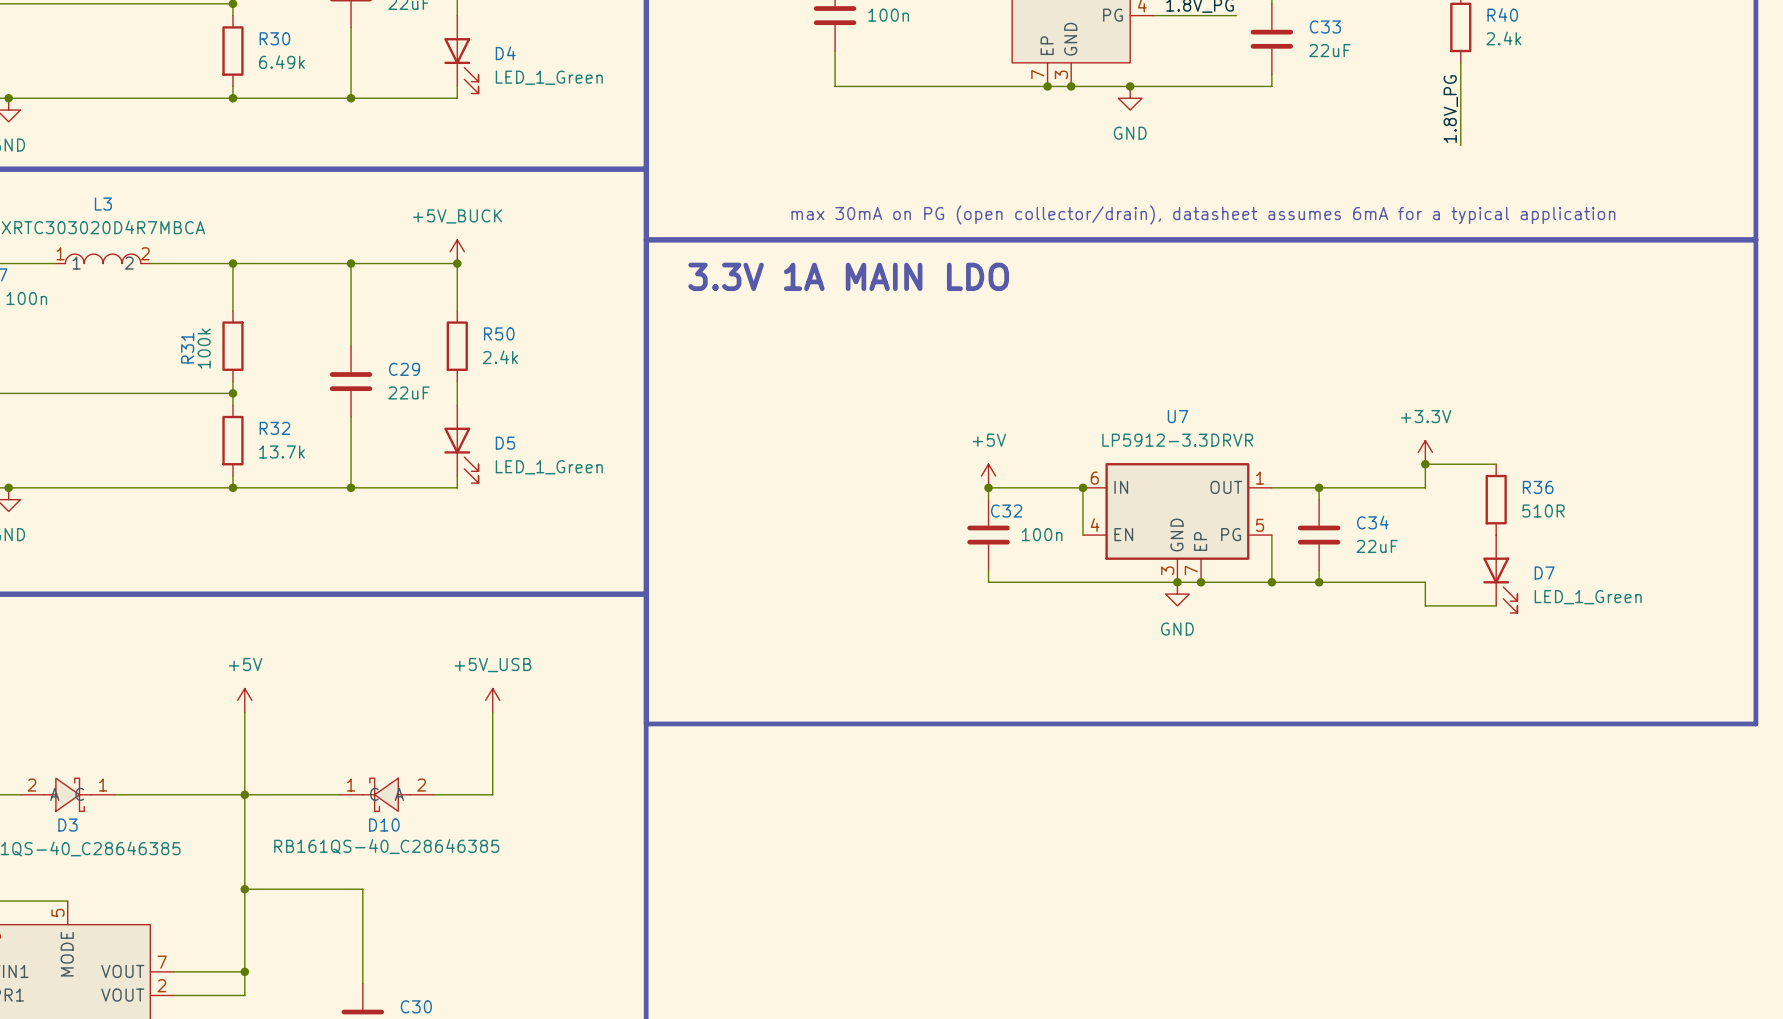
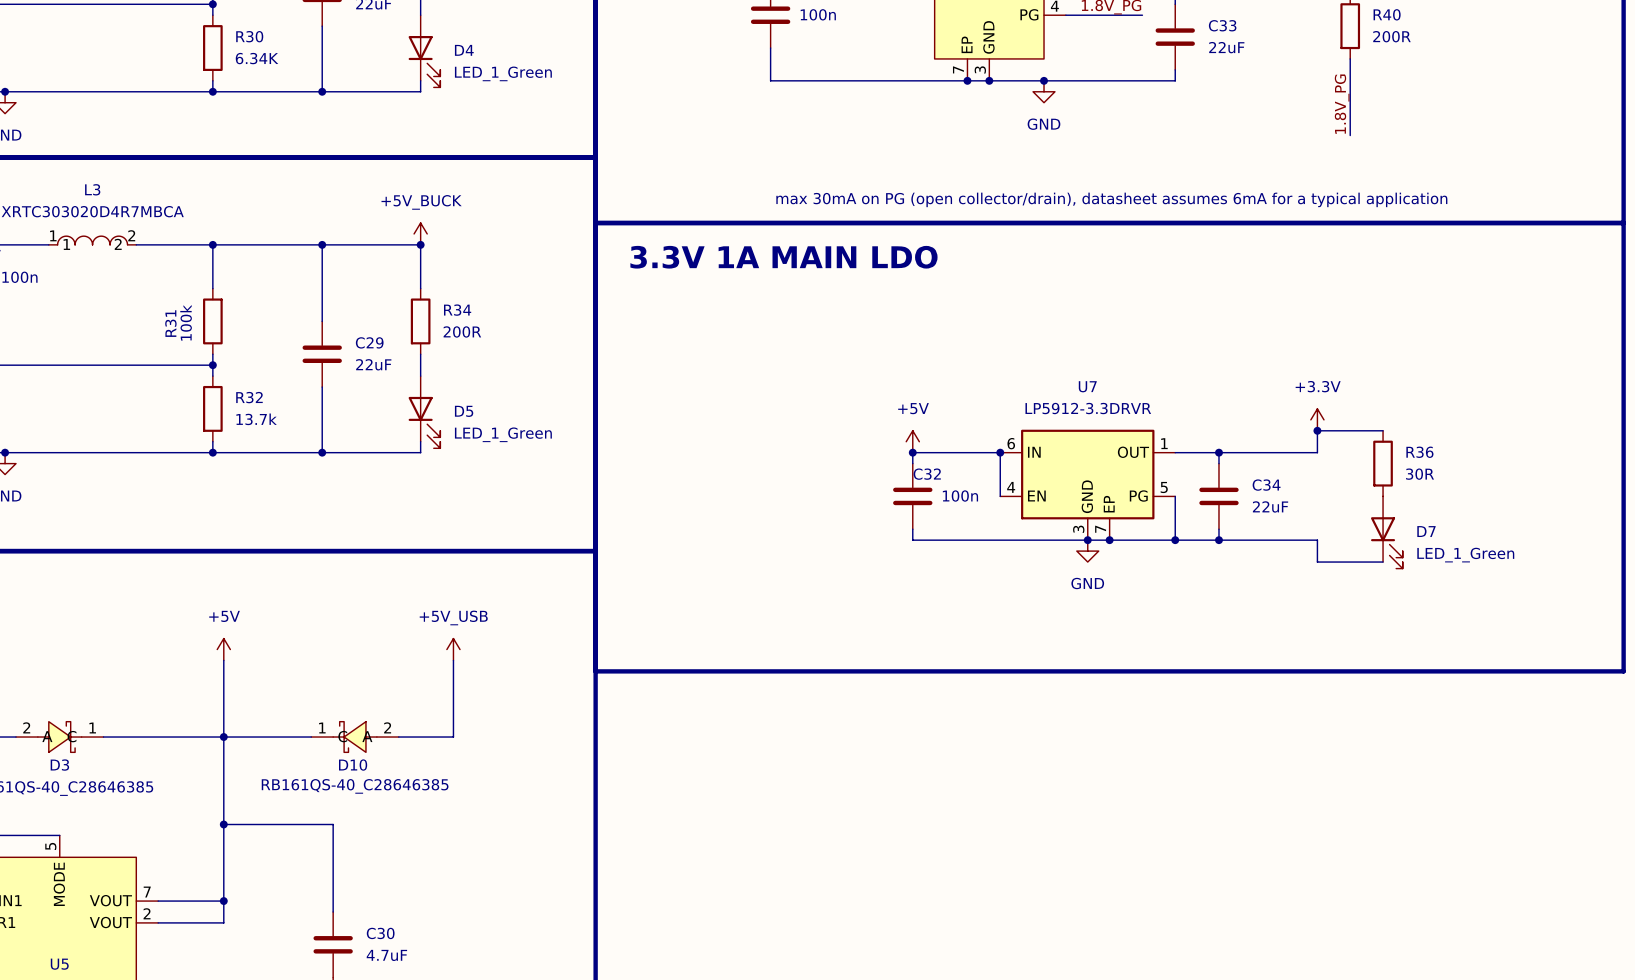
R40 value: 2.4k (1503, 38) -> 200R (1391, 36)
R30 value: 6.49k (281, 62) -> 6.34K (257, 58)
R50 name: R50 (499, 333) -> R34 (457, 310)
R50 value: 2.4k (500, 357) -> 200R (462, 331)
R36 value: 510R (1543, 511) -> 30R (1420, 474)

